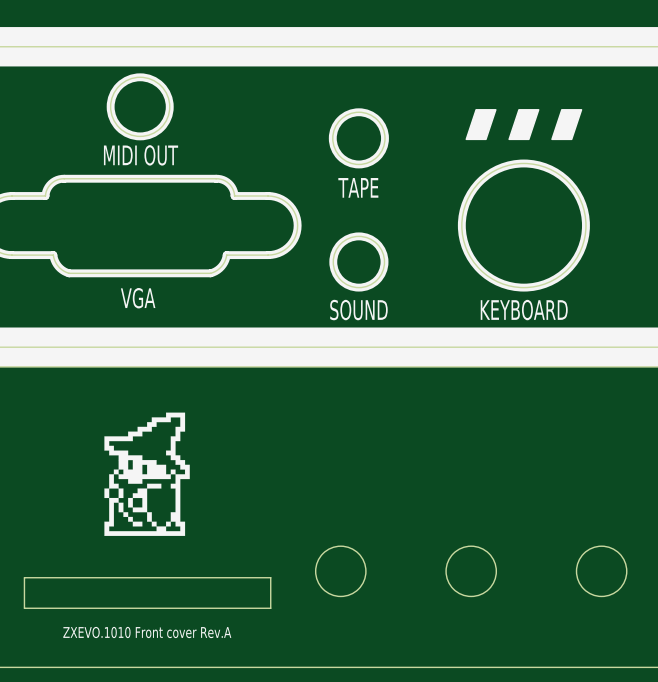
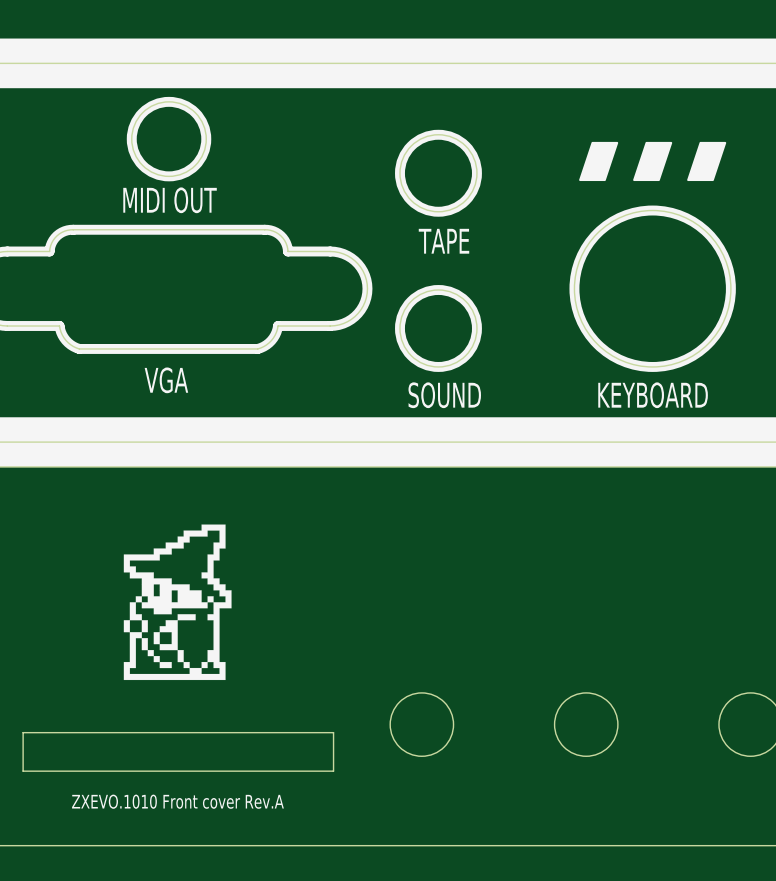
drawing shape: [328, 108, 389, 169] -> [395, 129, 482, 217]
round board edge size: [332, 111, 386, 165] -> [399, 134, 478, 213]
drawing shape: [329, 232, 389, 292] -> [395, 285, 482, 372]
round board edge size: [332, 235, 386, 289] -> [399, 289, 478, 368]

